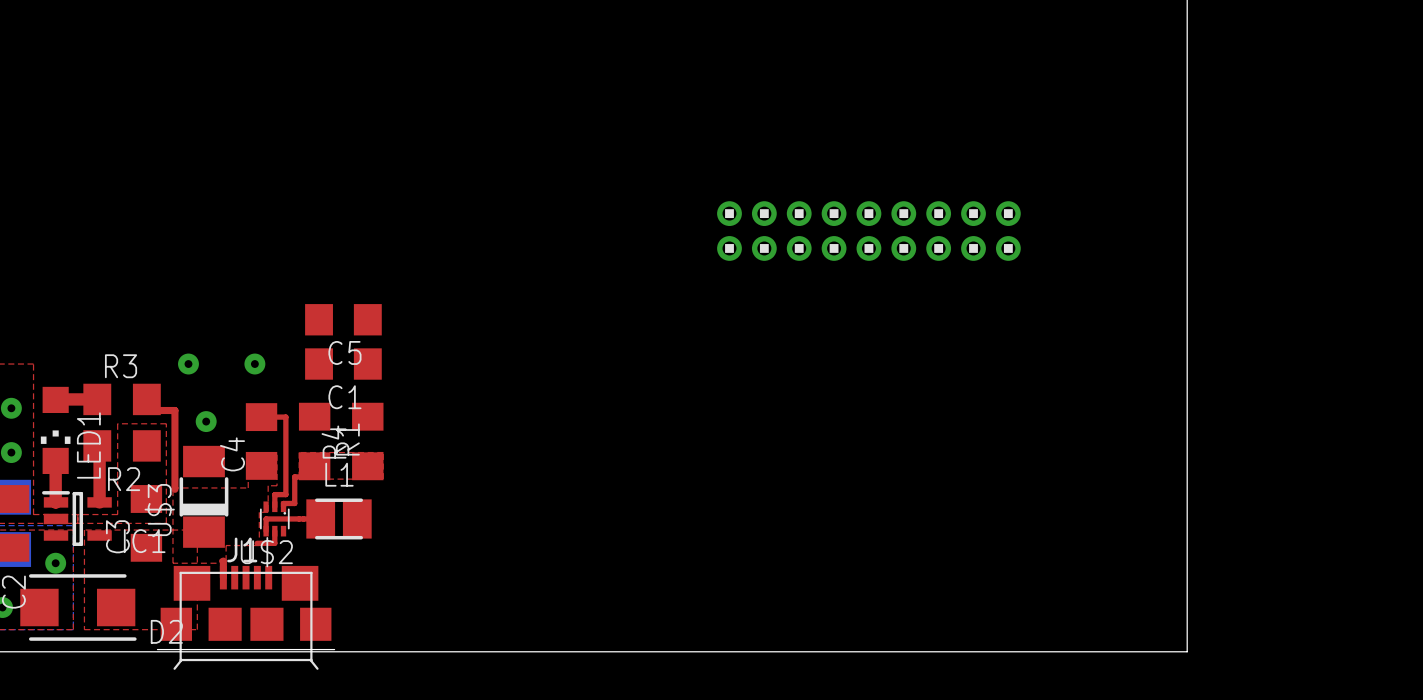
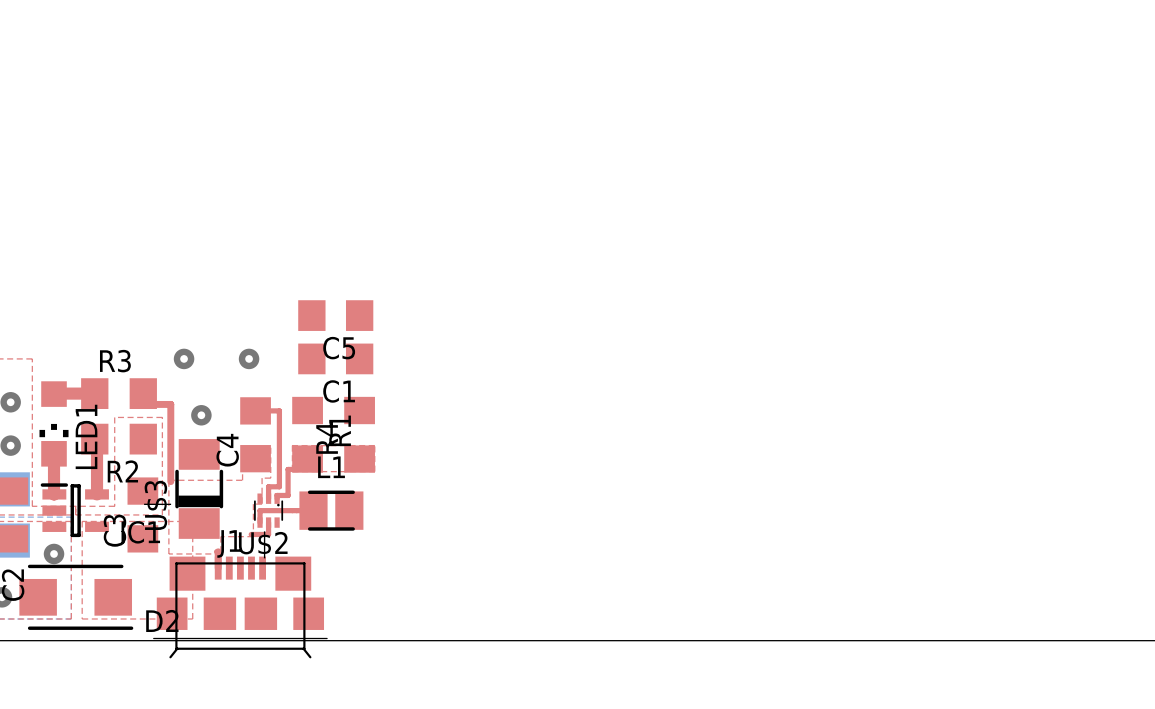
part: (868, 231) -> none

